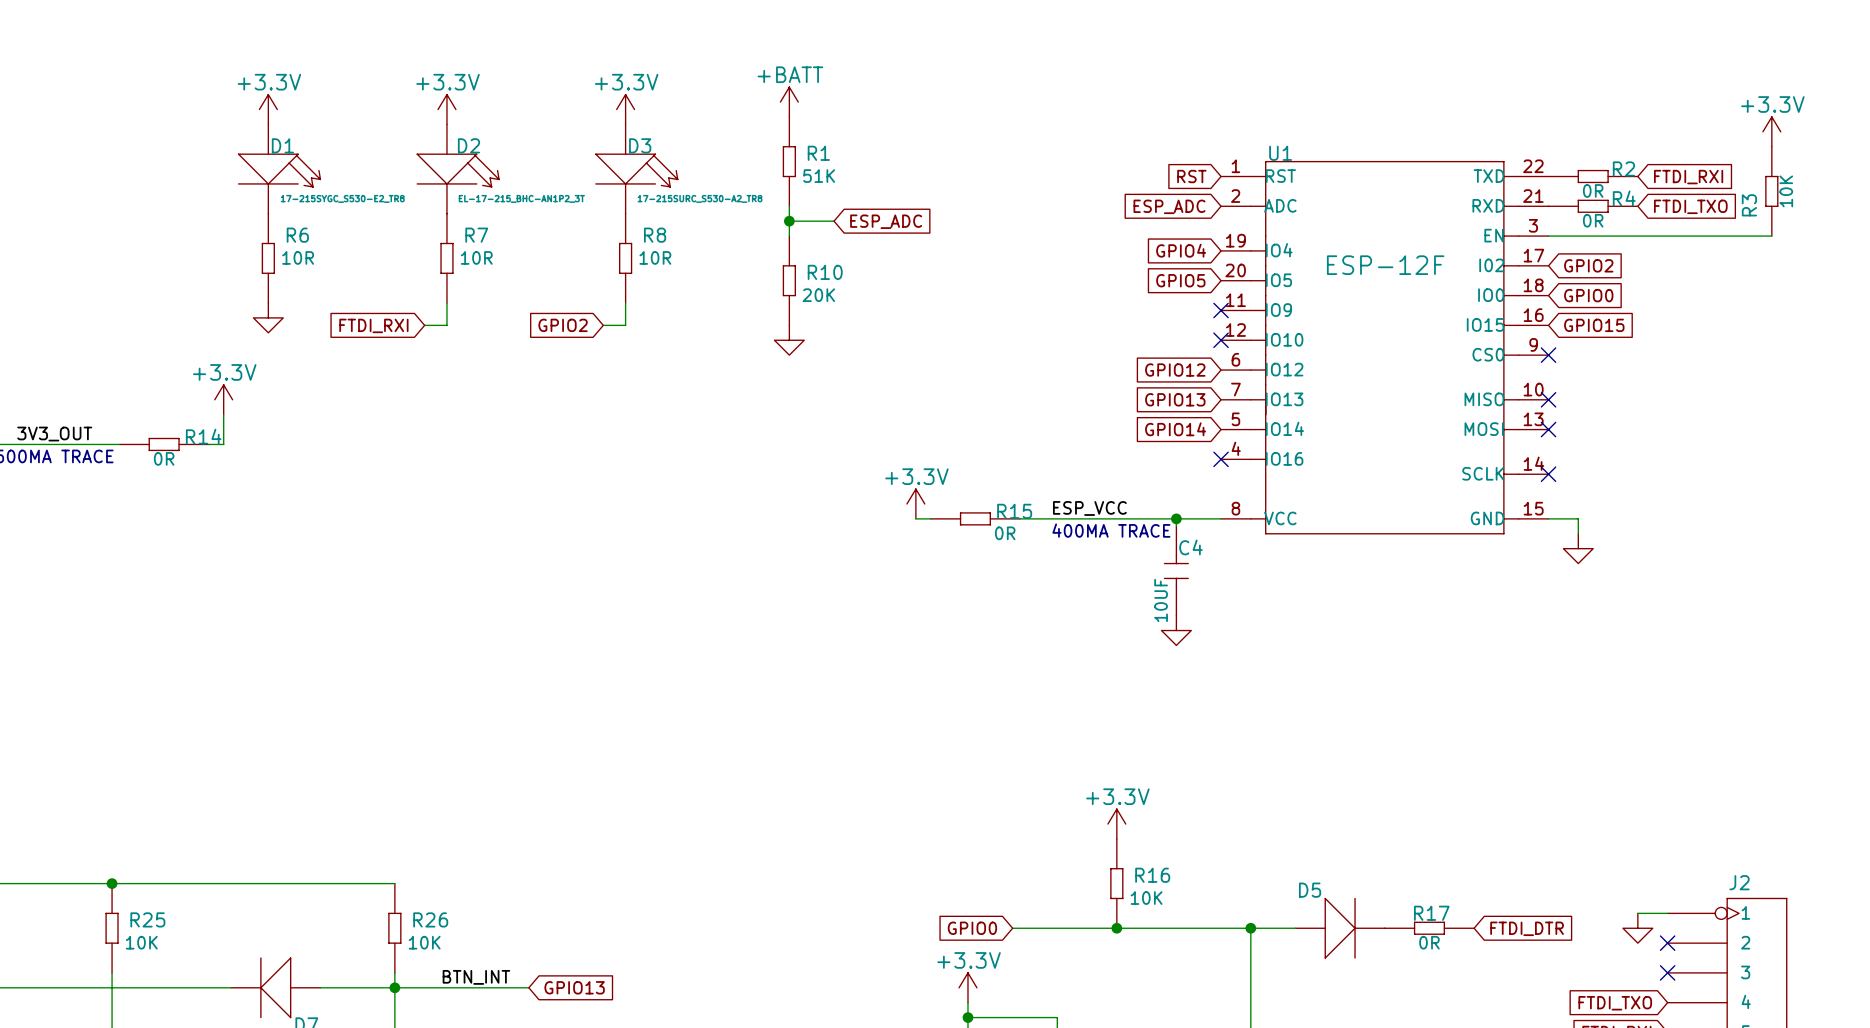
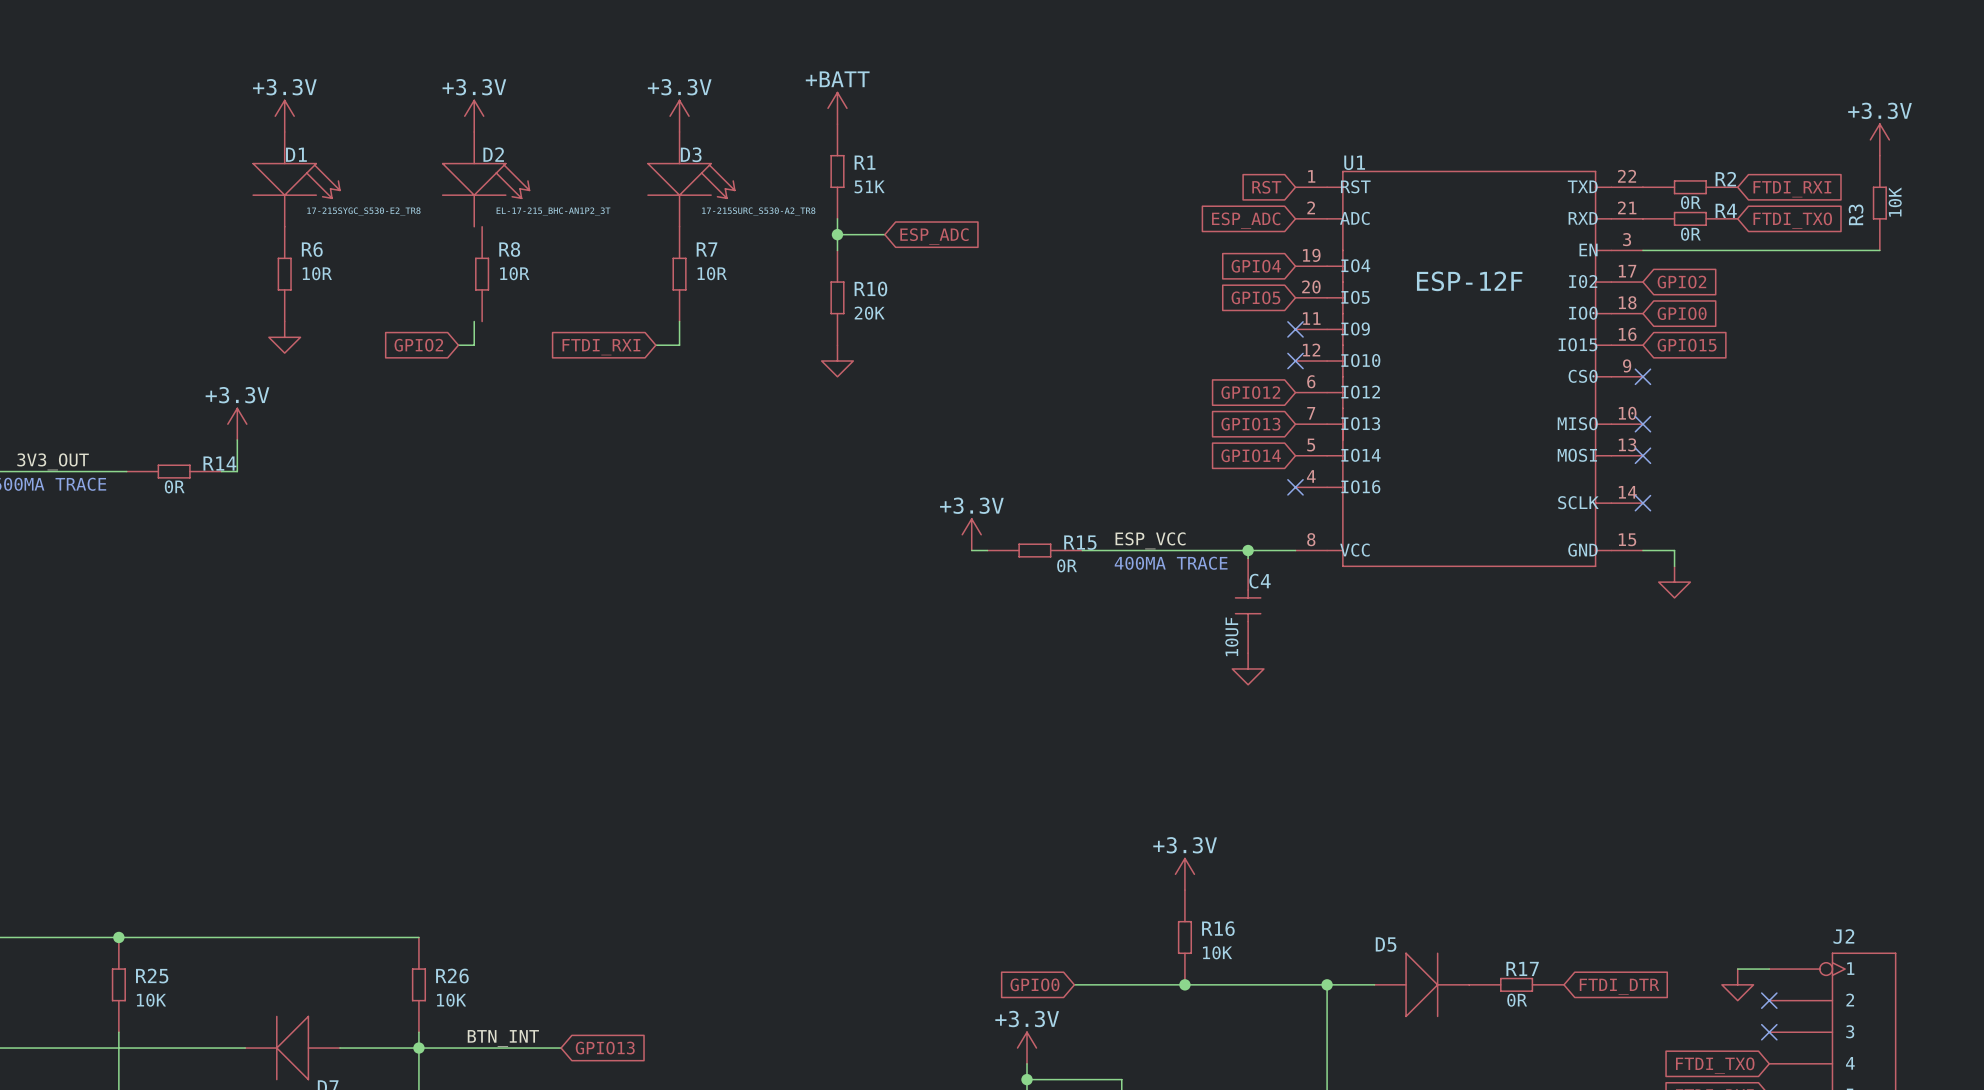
power symbol position: +3.3V (625, 109) -> +3.3V (679, 116)
D3 position: (636, 169) -> (691, 179)
R7 position: (446, 258) -> (679, 274)
R8 position: (625, 258) -> (482, 274)
wire: (625, 303) (625, 325) -> (679, 321) (679, 345) (663, 345)
global label position: FTDI_RXI (373, 325) -> FTDI_RXI (601, 347)
wire: (424, 325) (432, 325) -> none
global label position: GPIO2 (563, 325) -> GPIO2 (418, 345)
wire: (603, 325) (618, 325) -> none

